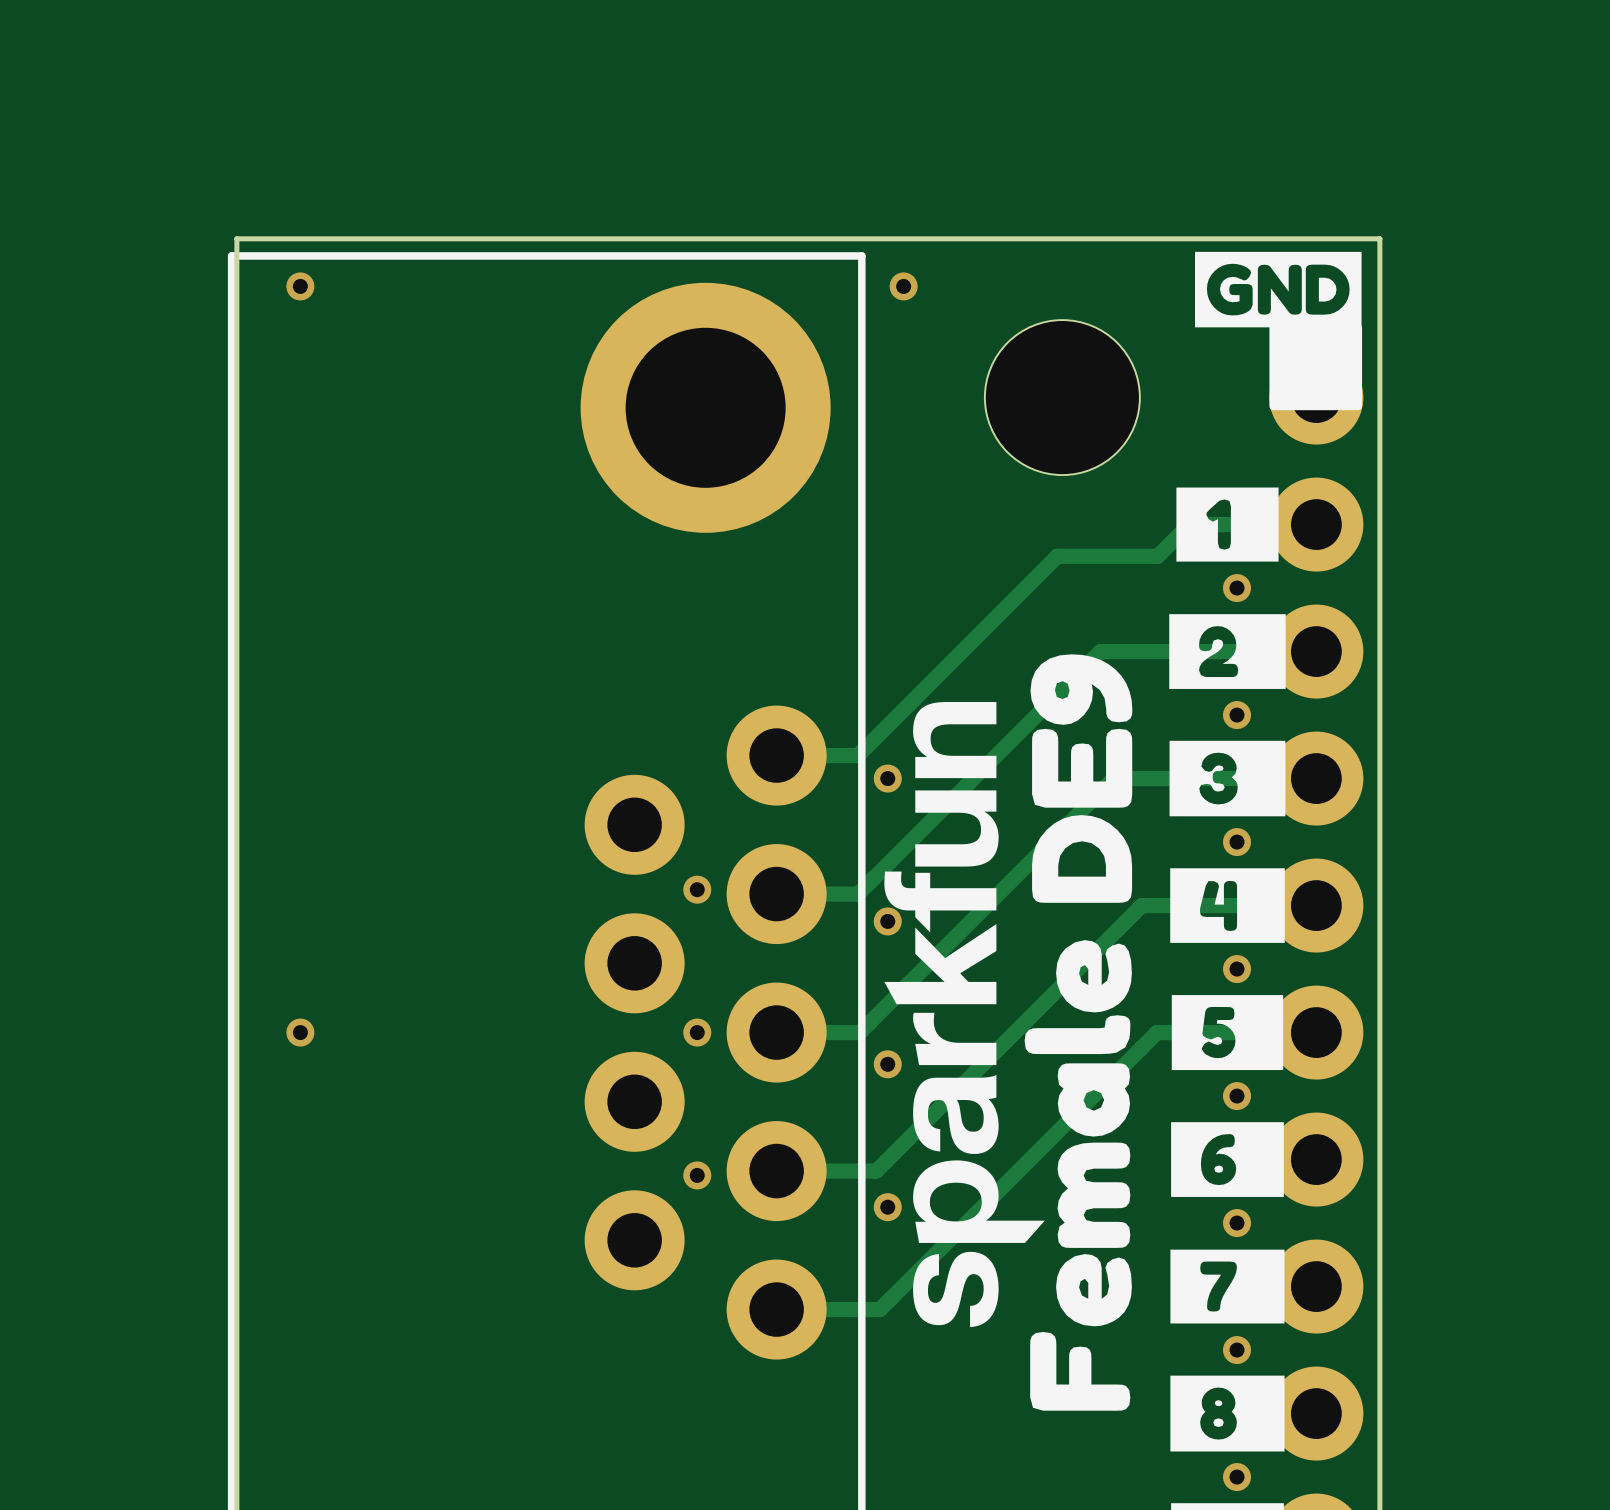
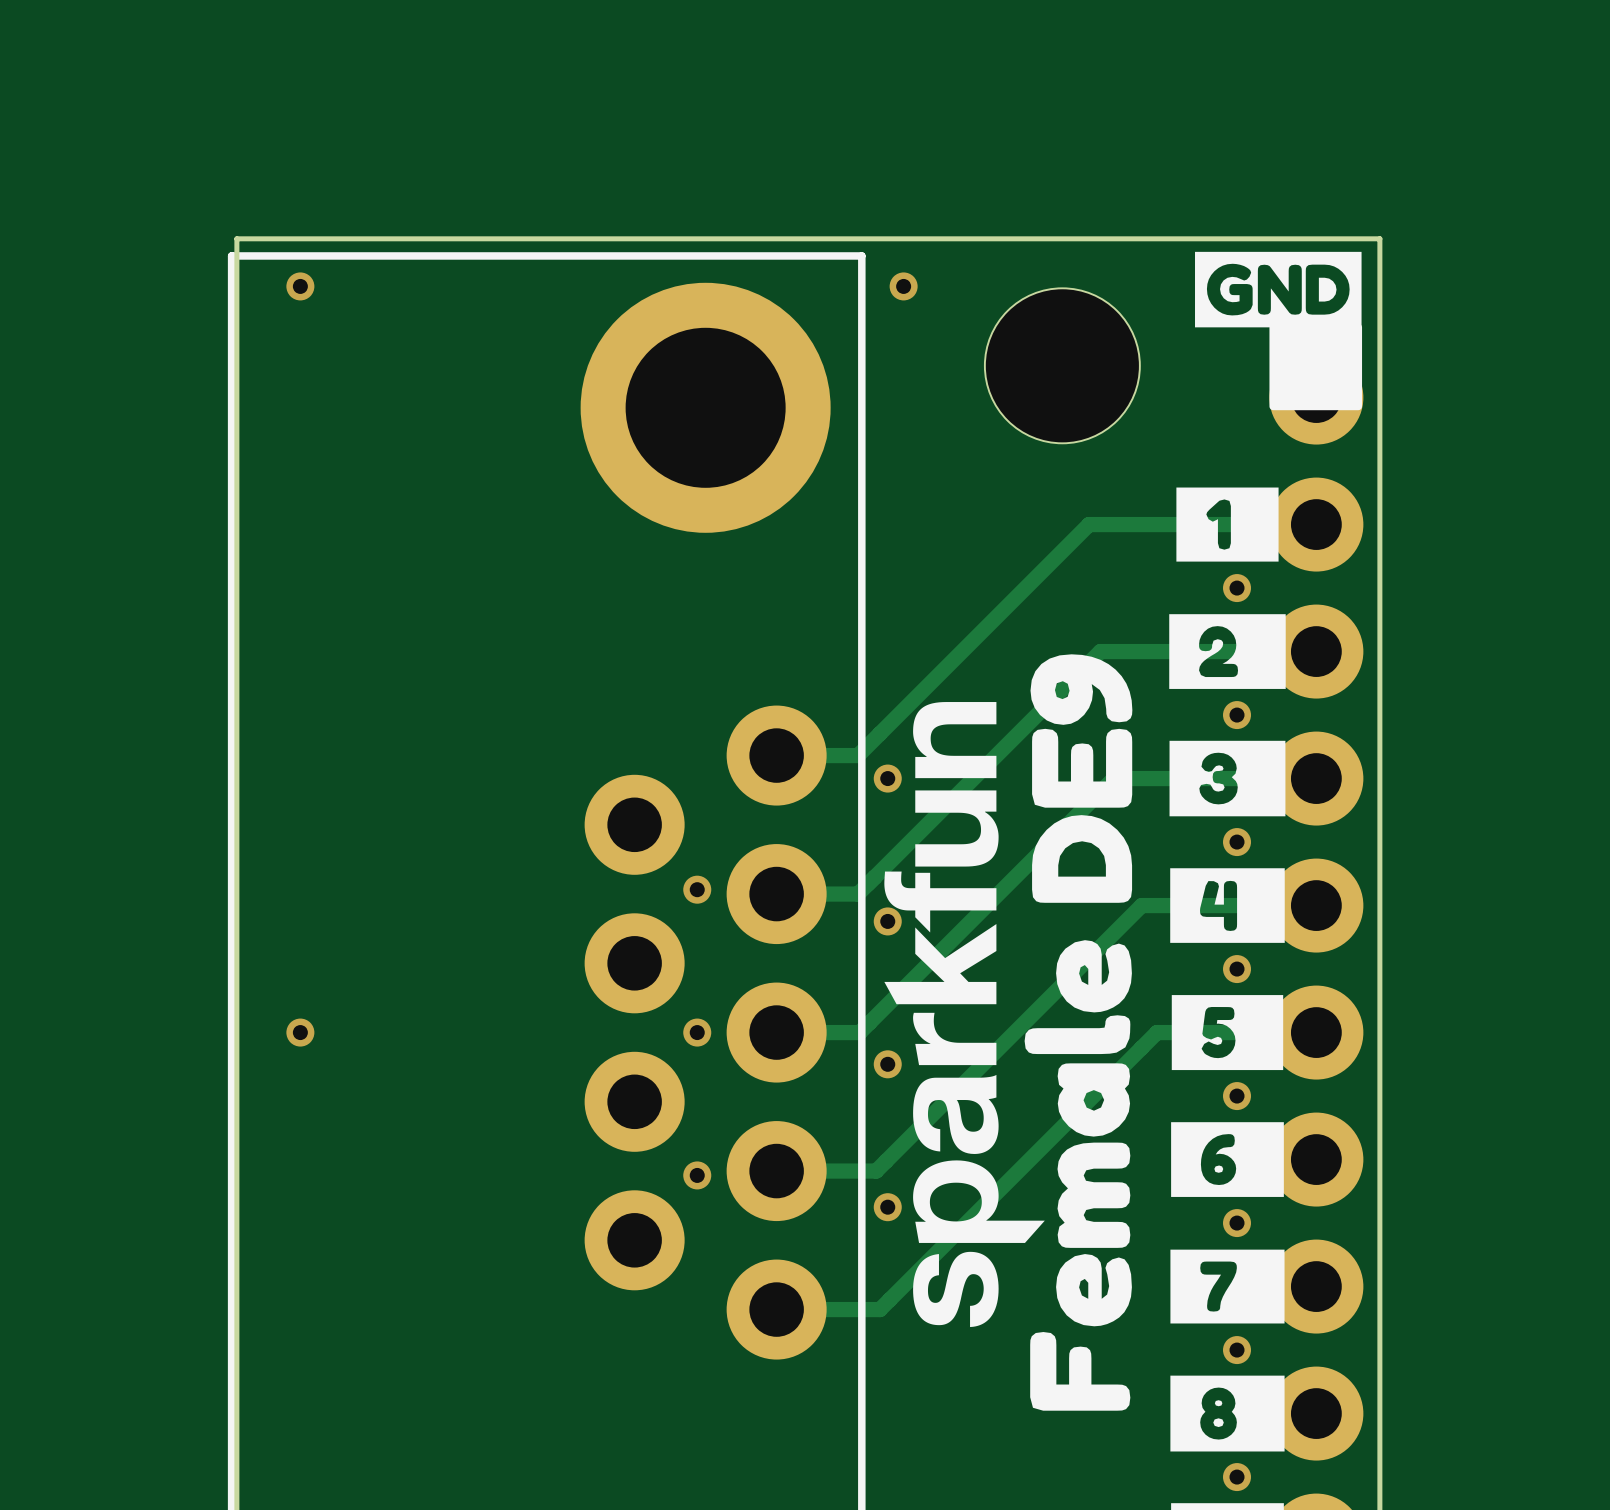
part position: (1062, 397) -> (1062, 365)
track: (1189, 524) (1157, 556) (1057, 556) -> (1189, 524) (1089, 524) (1057, 556)

